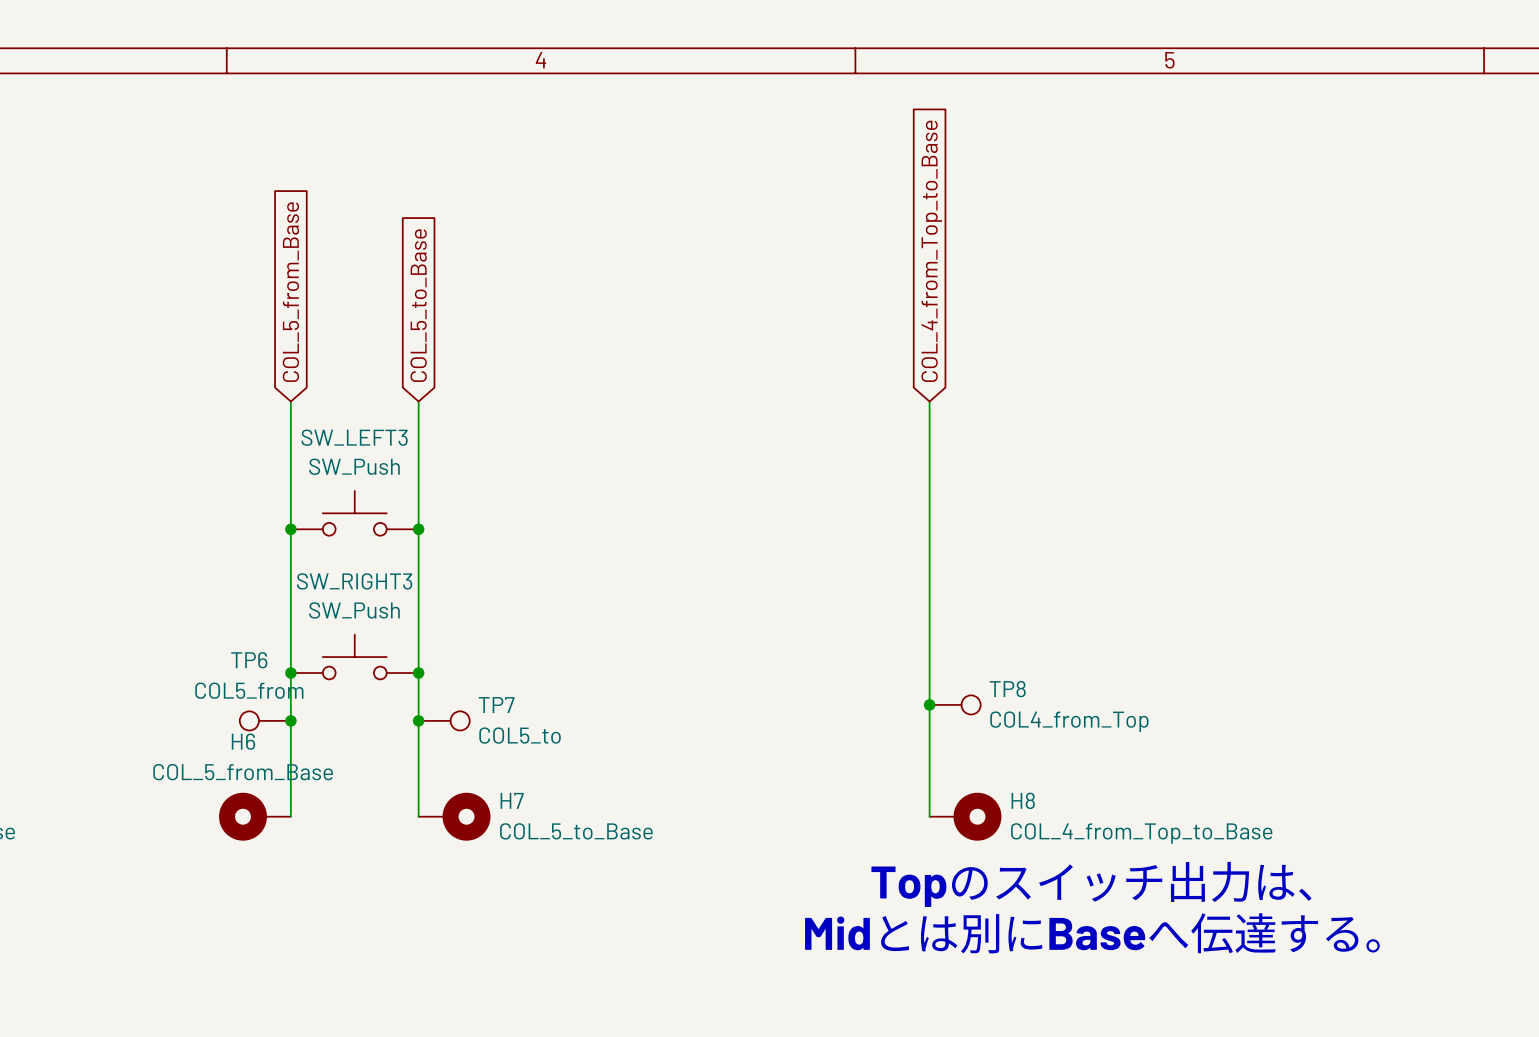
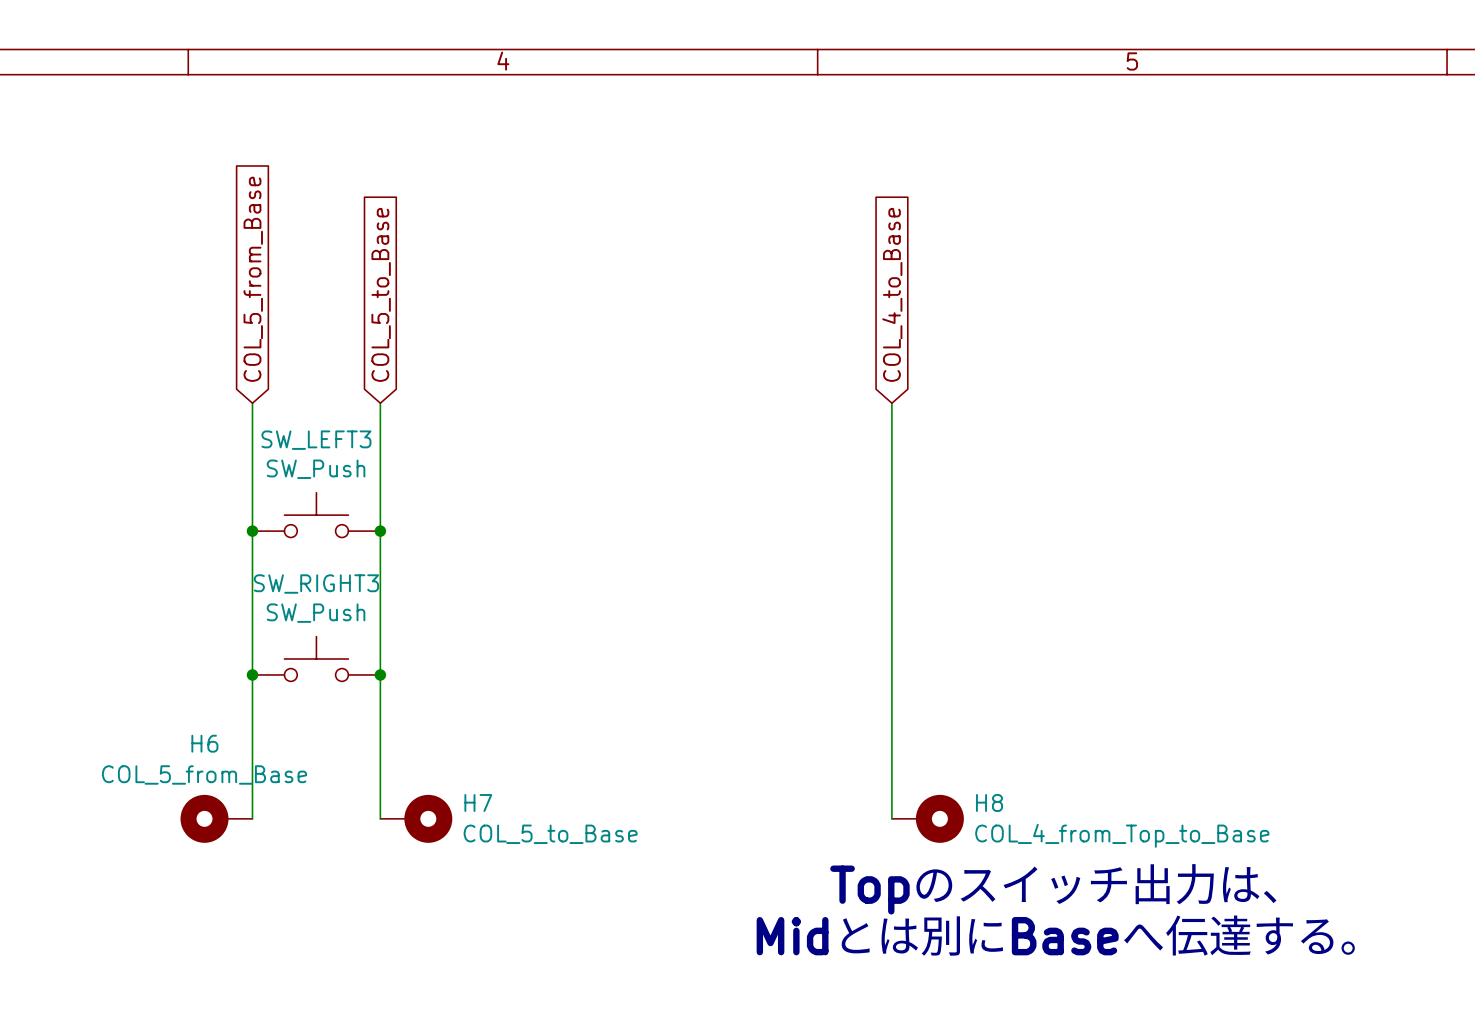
global label: COL_4_from_Top_to_Base (931, 251) -> COL_4_to_Base (892, 294)
junction: (929, 704) -> none
TP8: COL4_from_Top (955, 704) -> none
TP6: COL5_from (265, 720) -> none
junction: (290, 720) -> none
junction: (418, 720) -> none
TP7: COL5_to (444, 720) -> none

